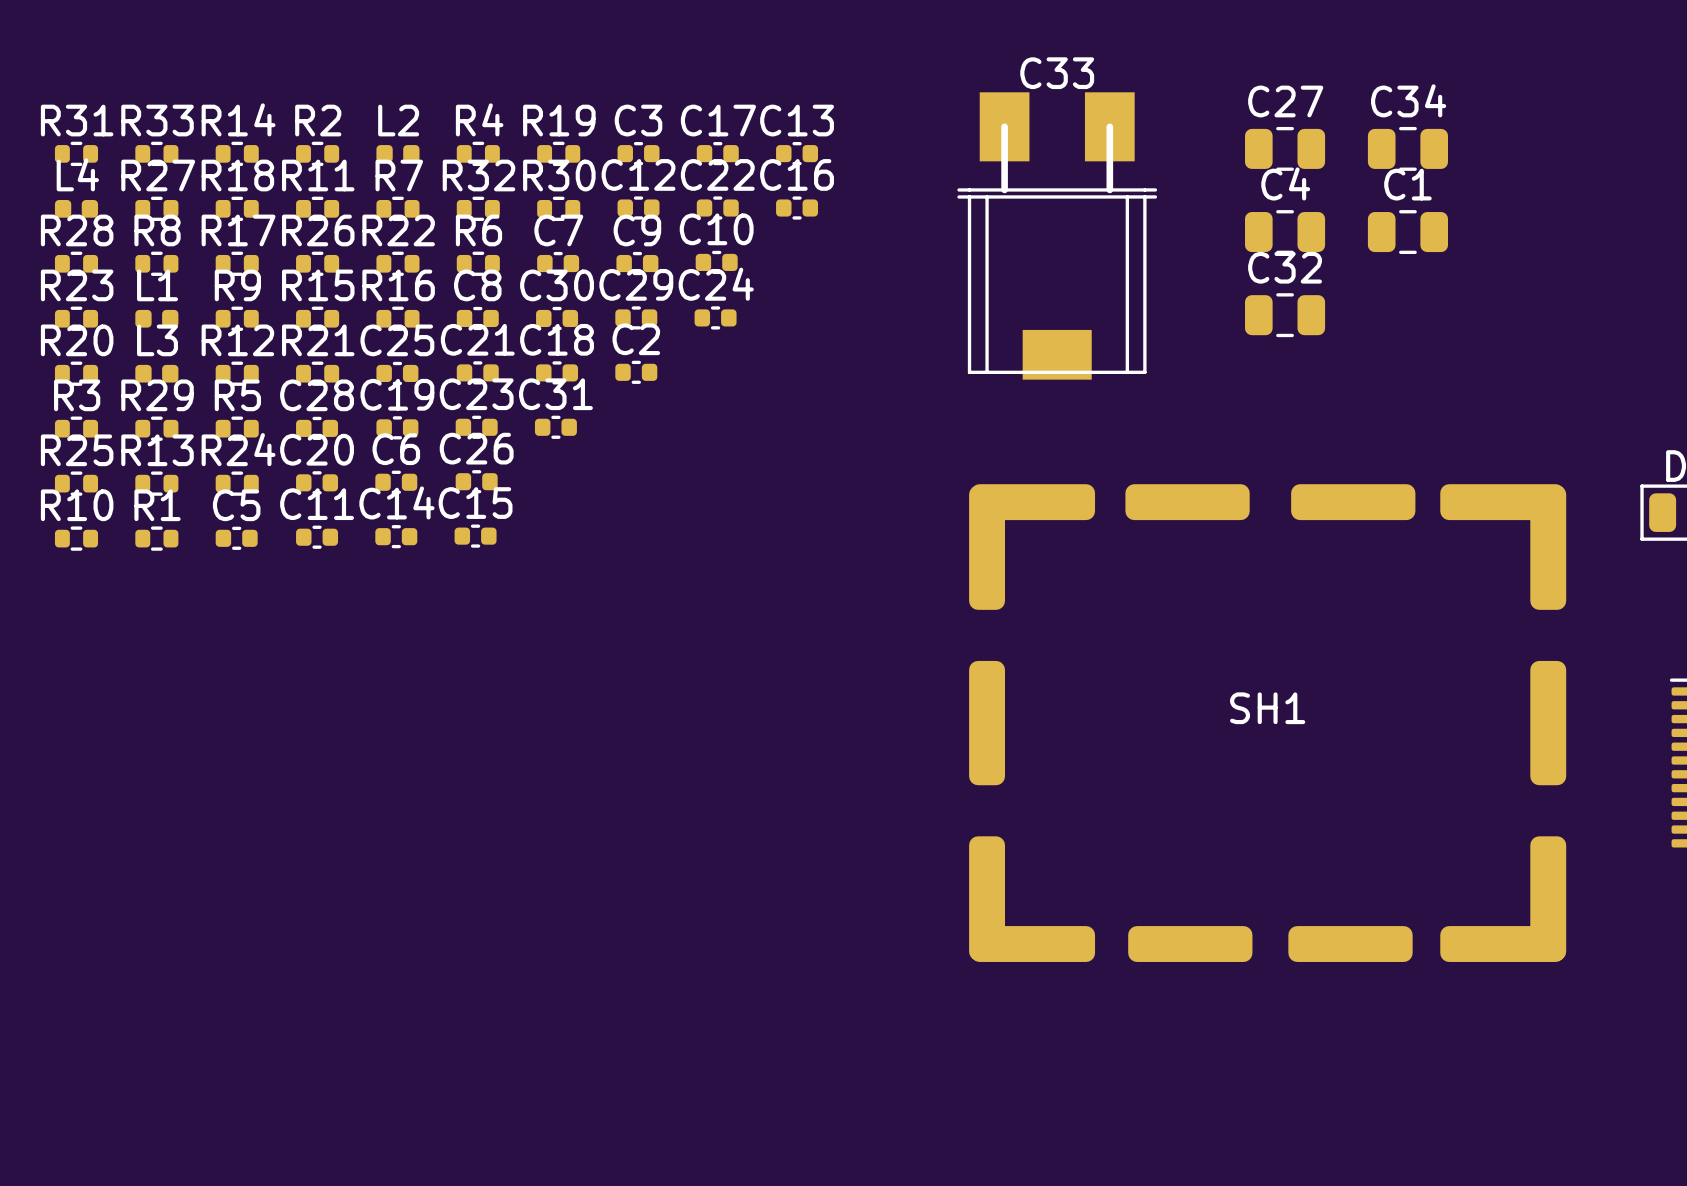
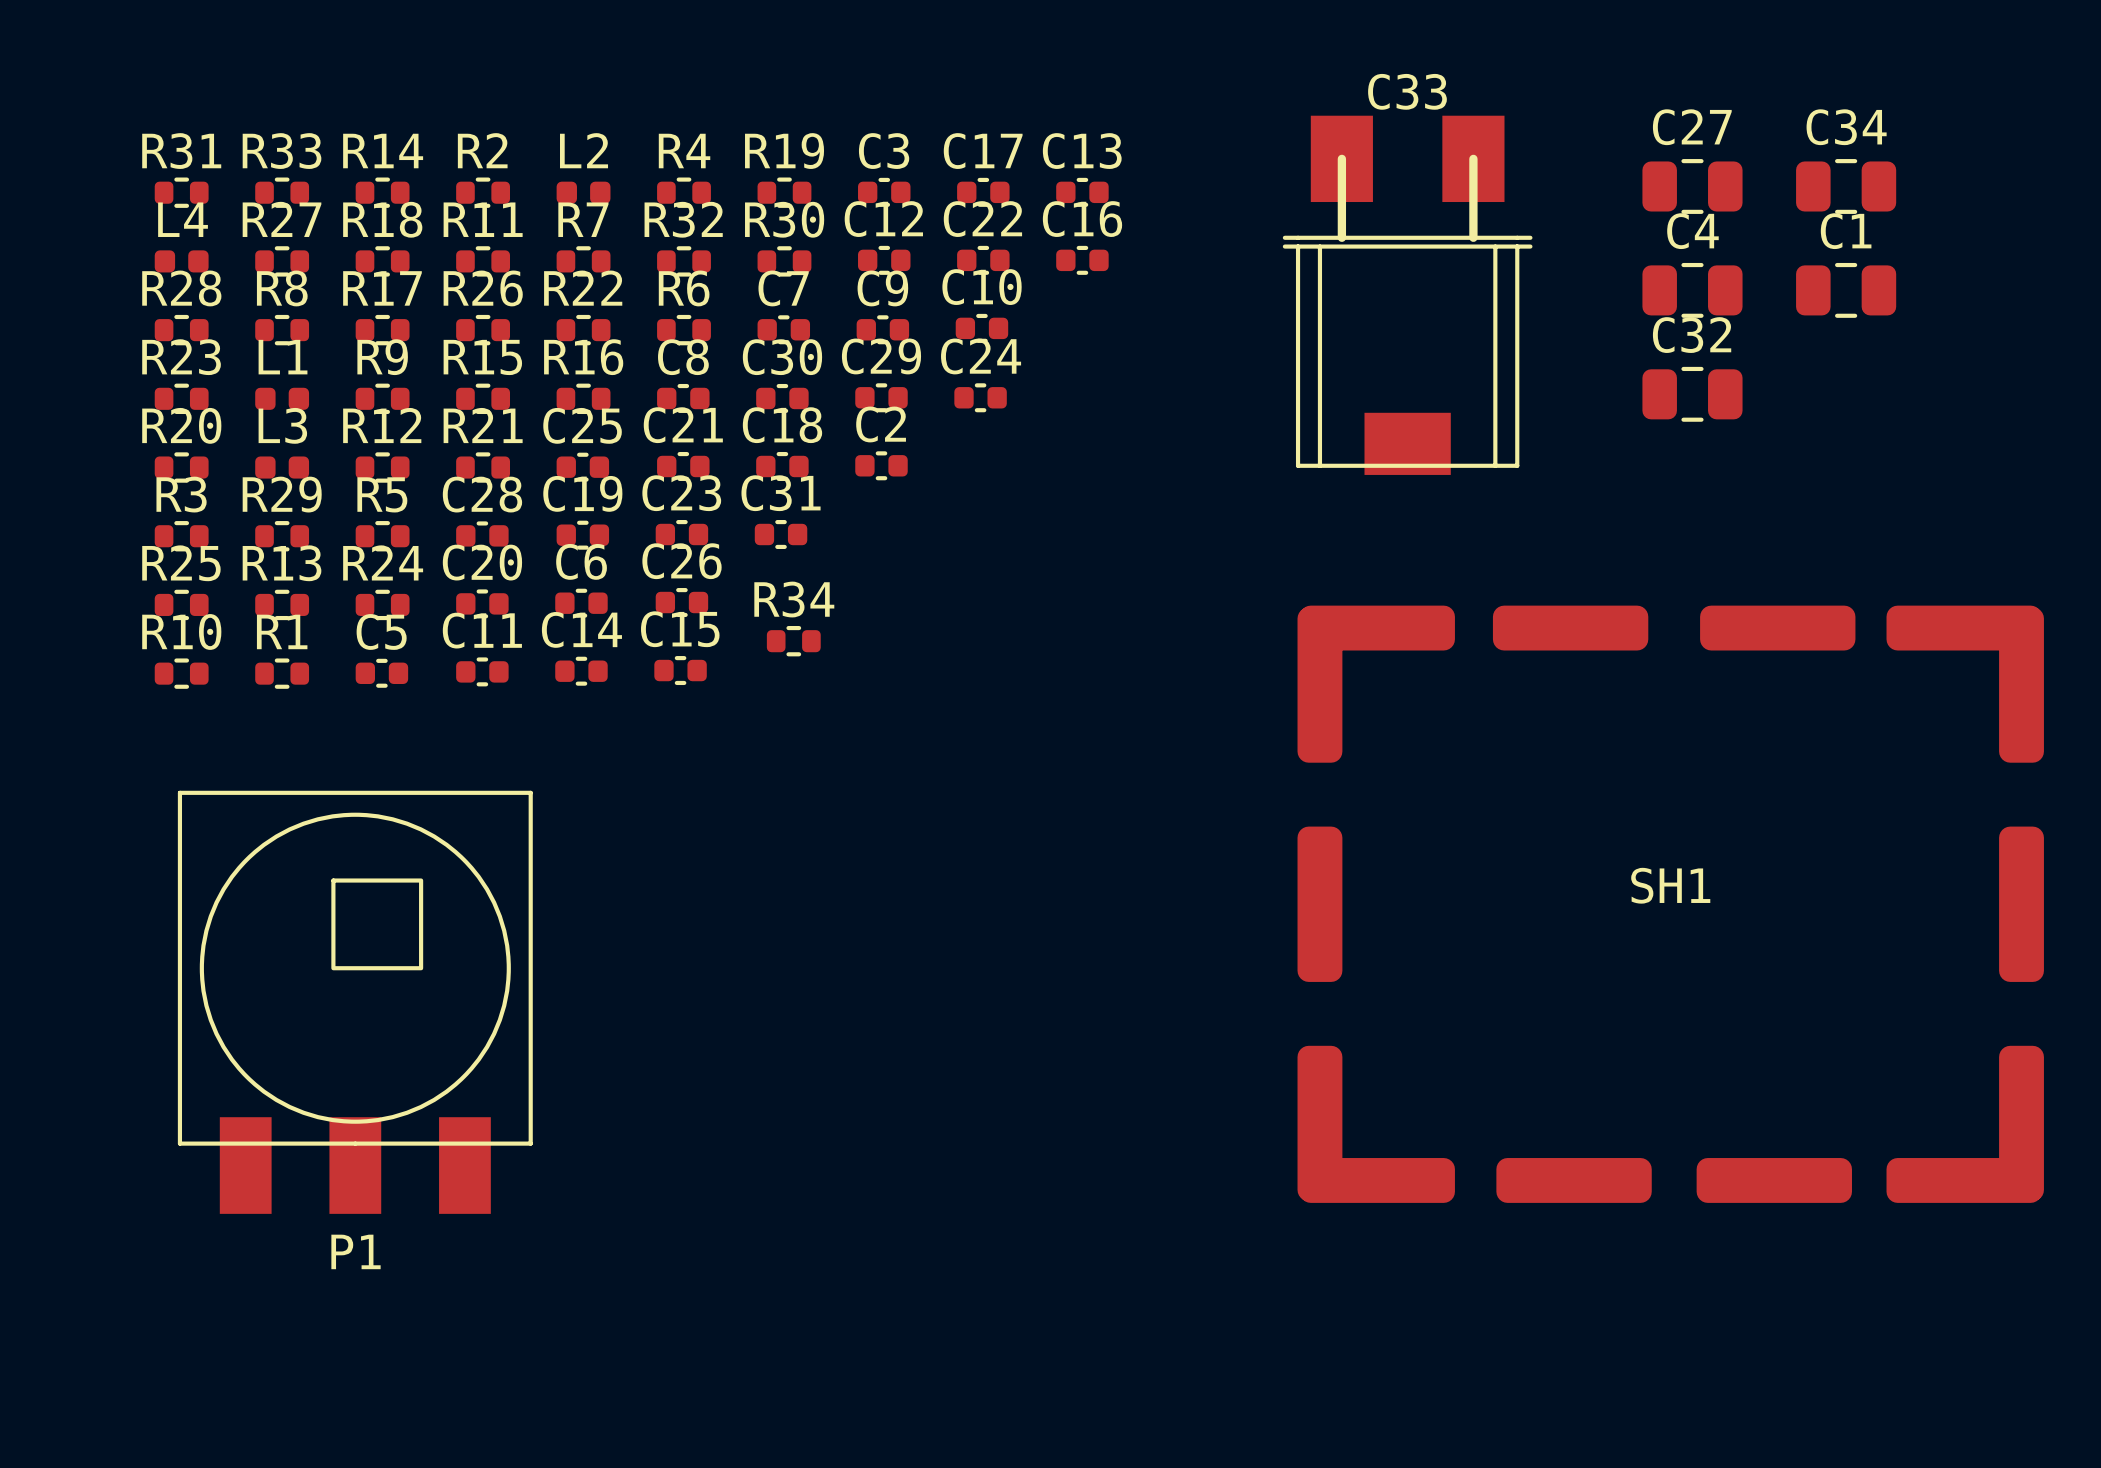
R34: none -> (793, 641)
P1: none -> (355, 1002)

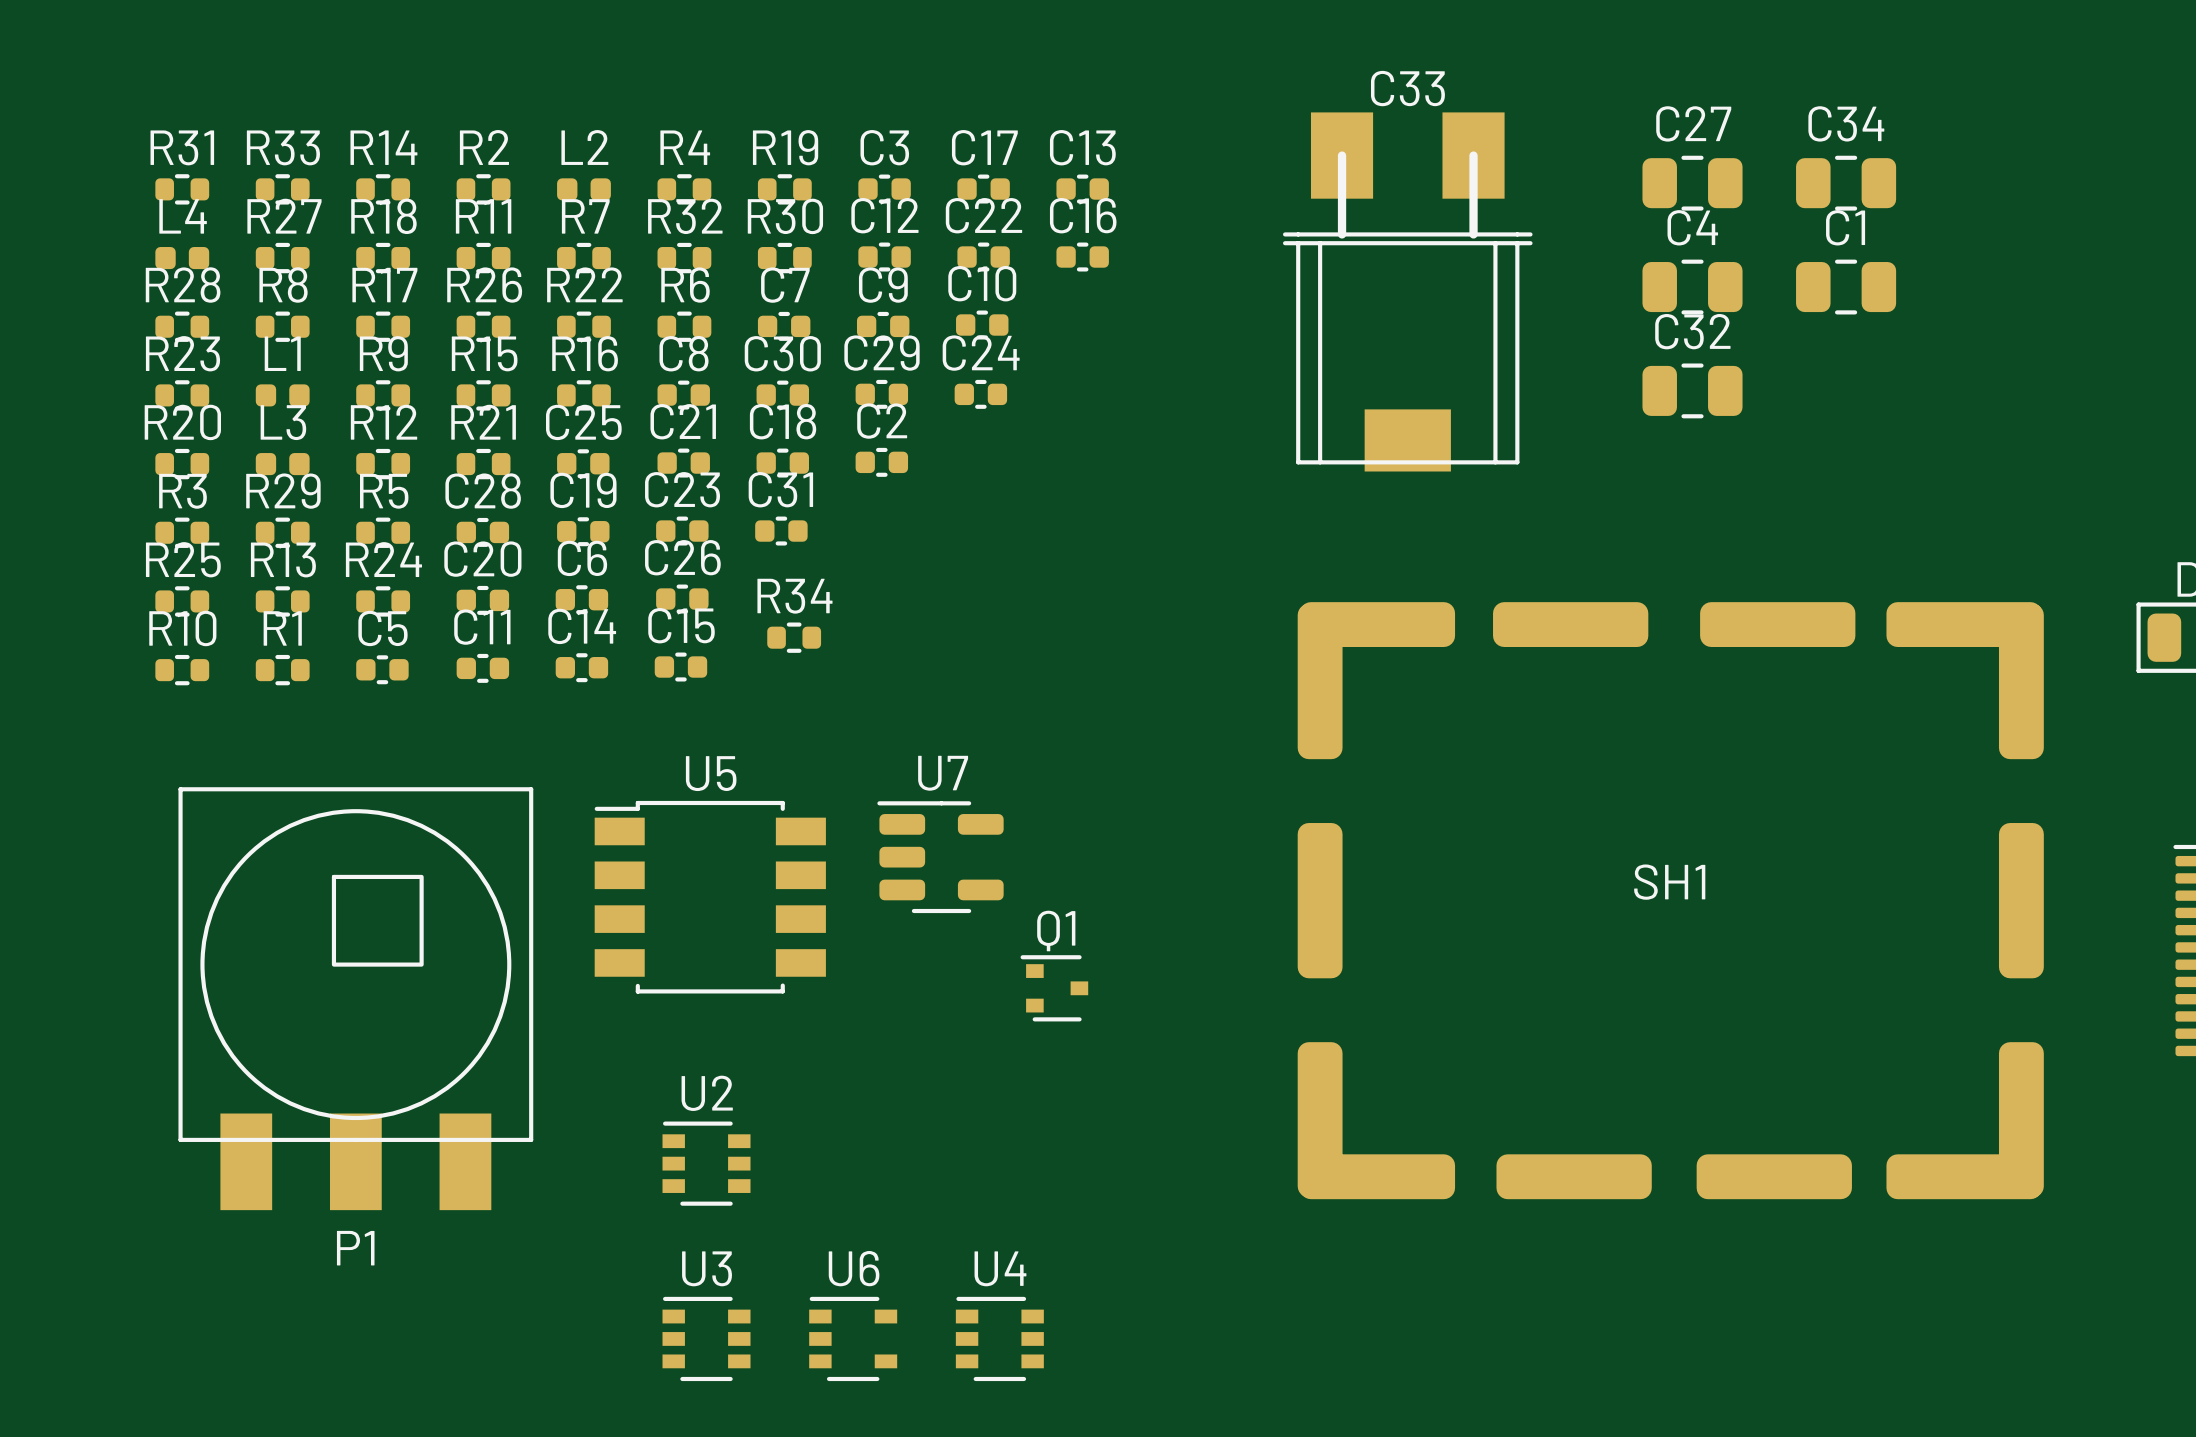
U7: none -> (940, 857)
U5: none -> (710, 897)
Q1: none -> (1054, 988)
U2: none -> (706, 1163)
U3: none -> (706, 1338)
U6: none -> (853, 1338)
U4: none -> (999, 1338)

